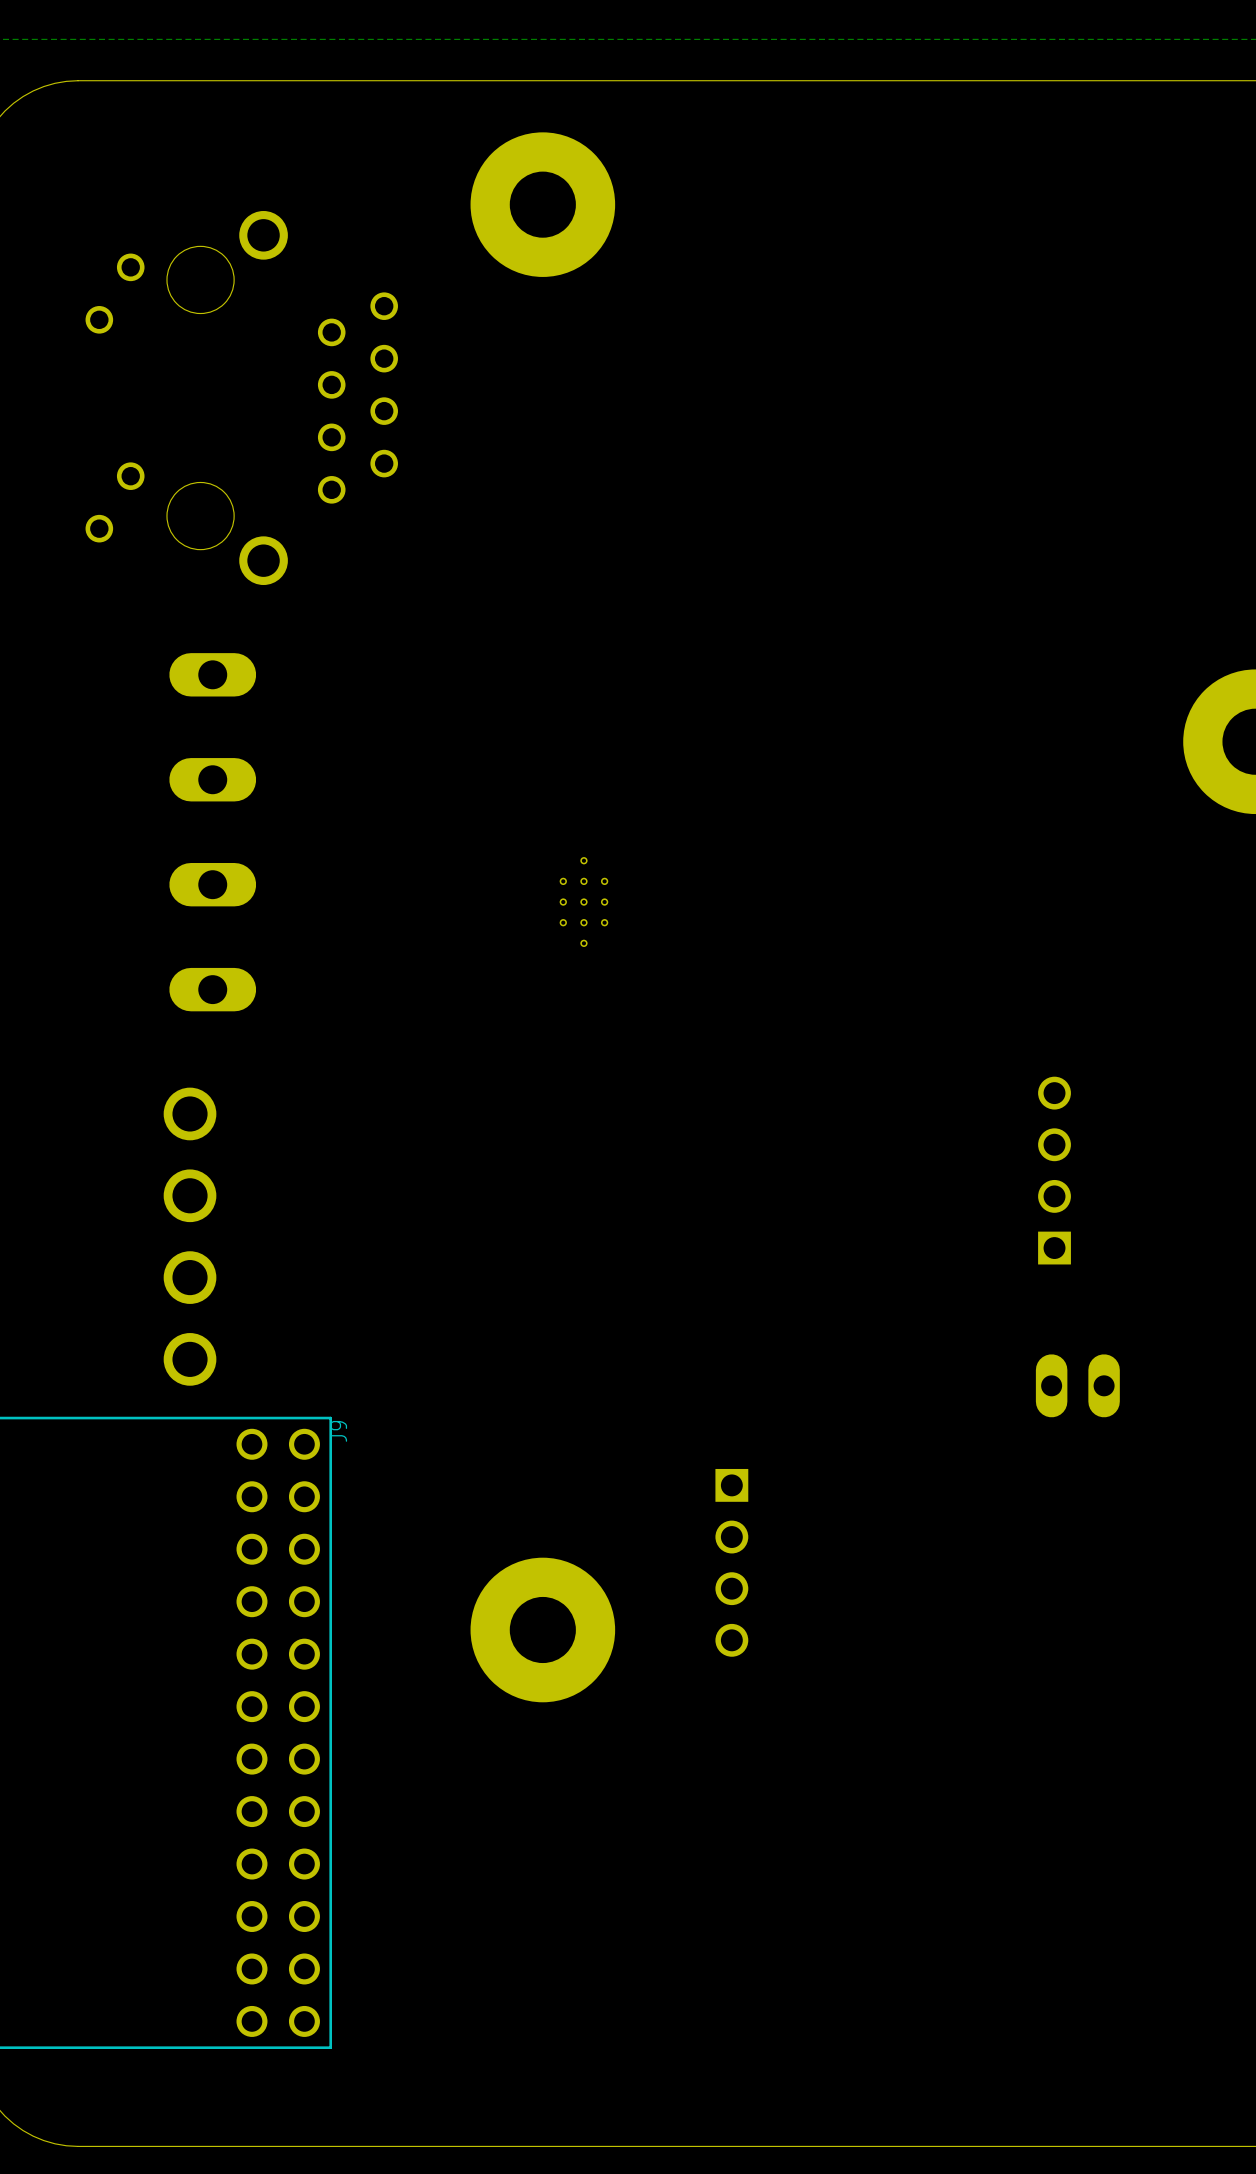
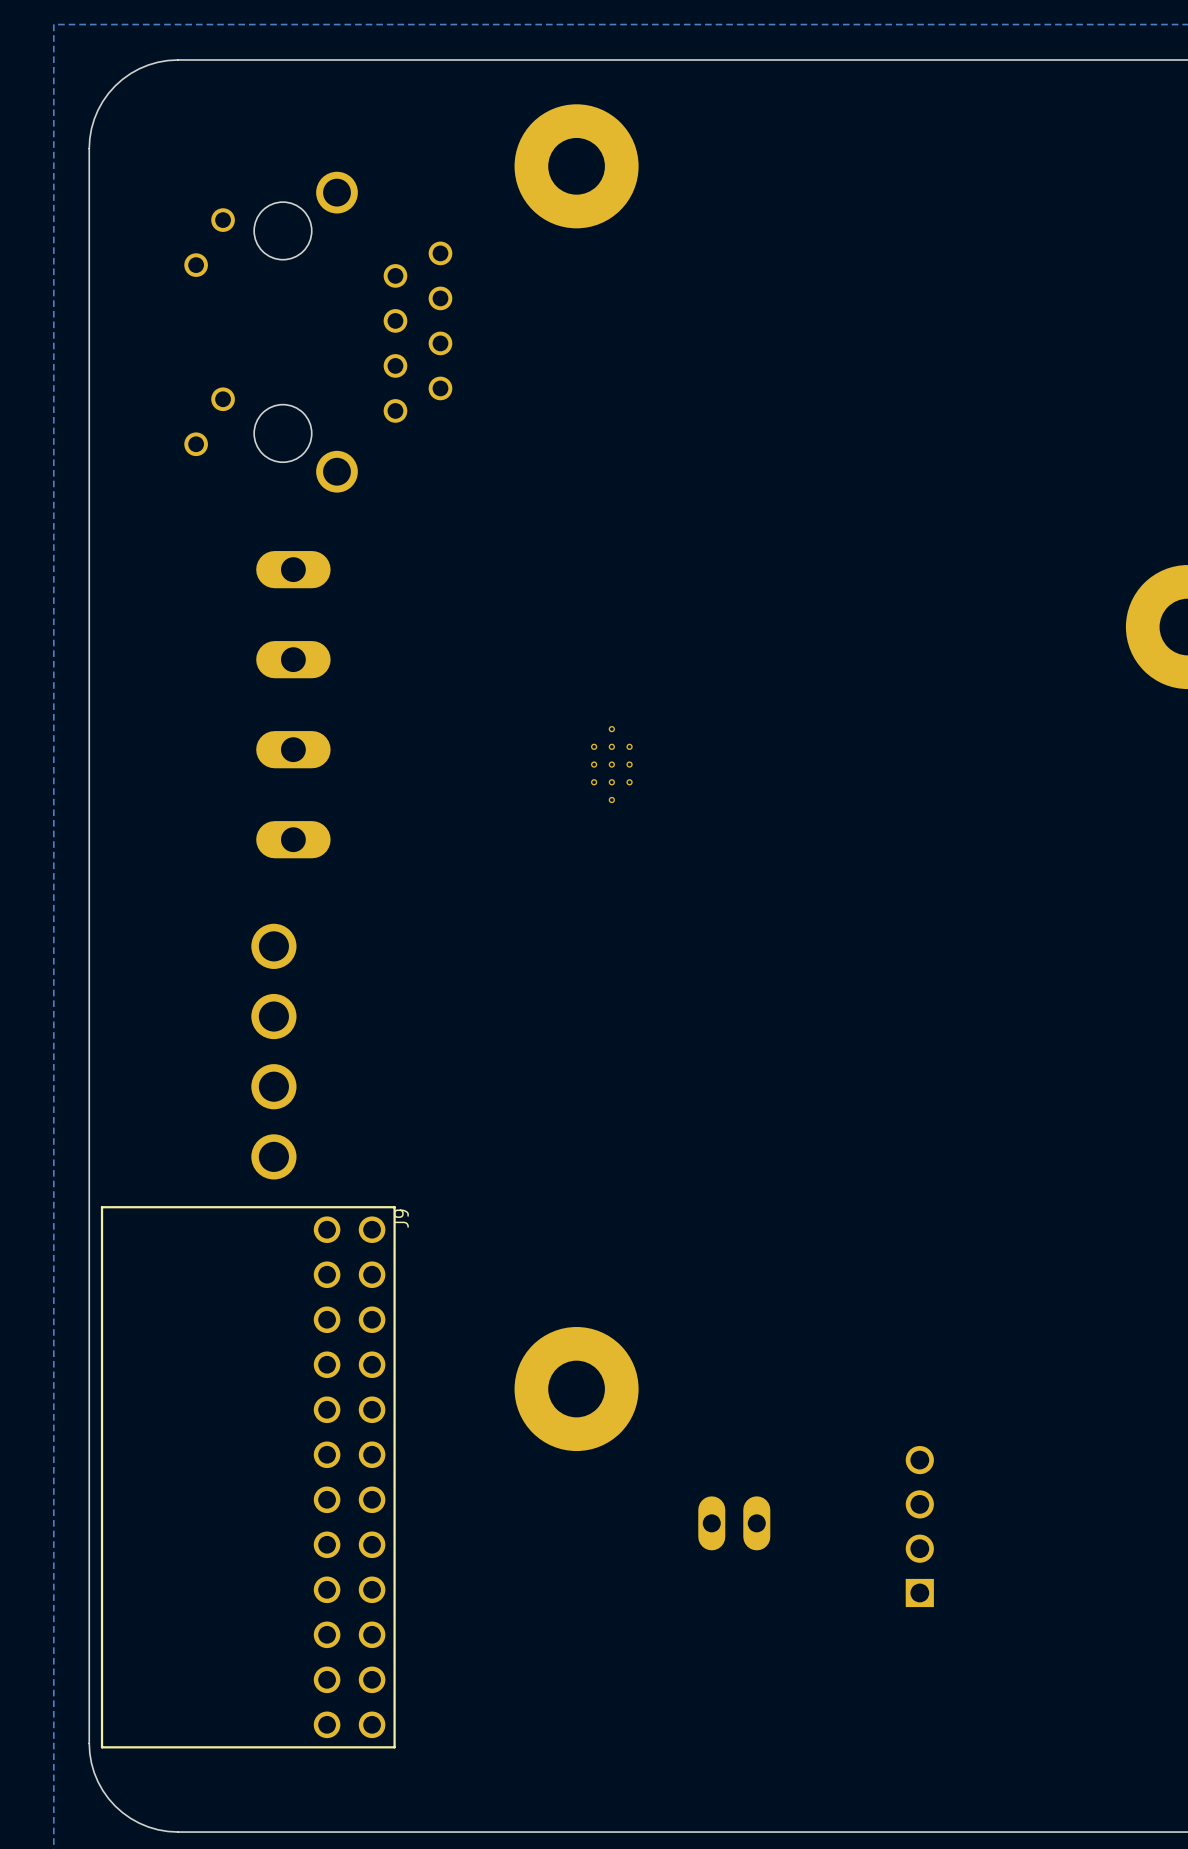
part: (1054, 1170) -> none
part: (1077, 1385) -> none
part rotation: 0° (731, 1562) -> 180° (919, 1526)
part position: (731, 1562) -> (919, 1526)
part: none -> (734, 1523)

